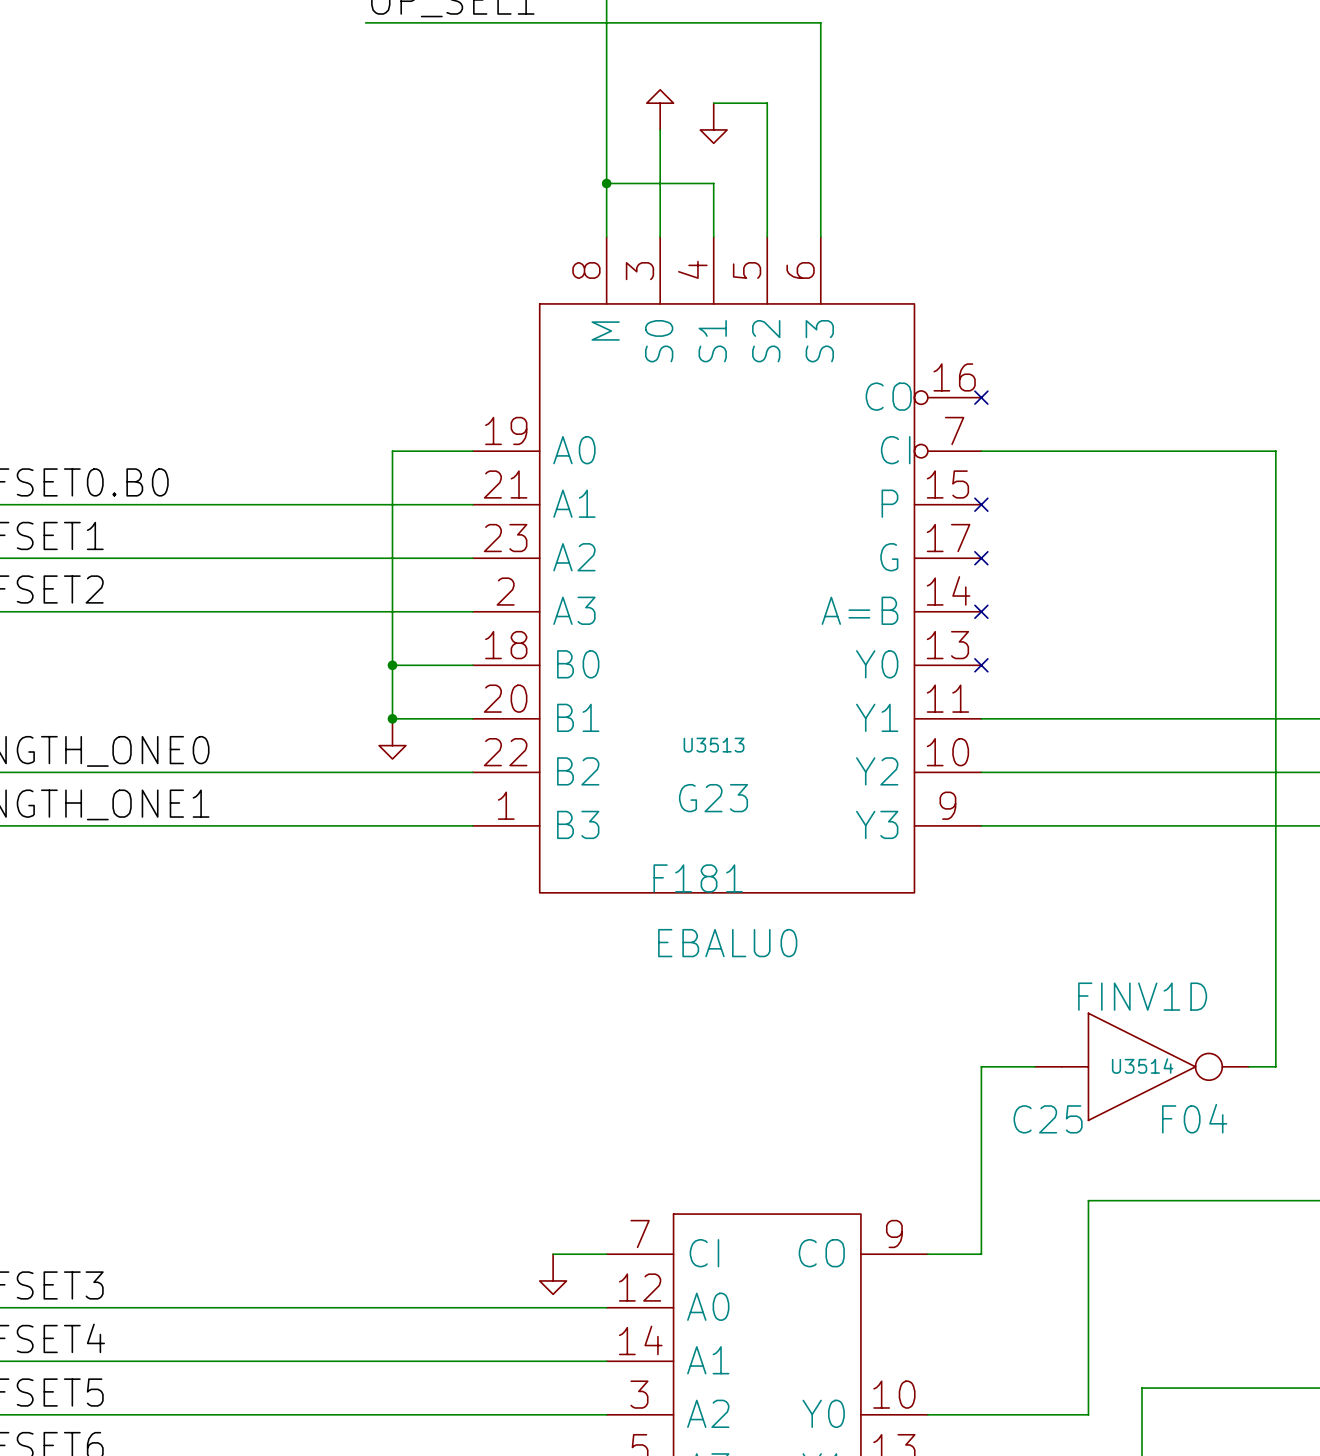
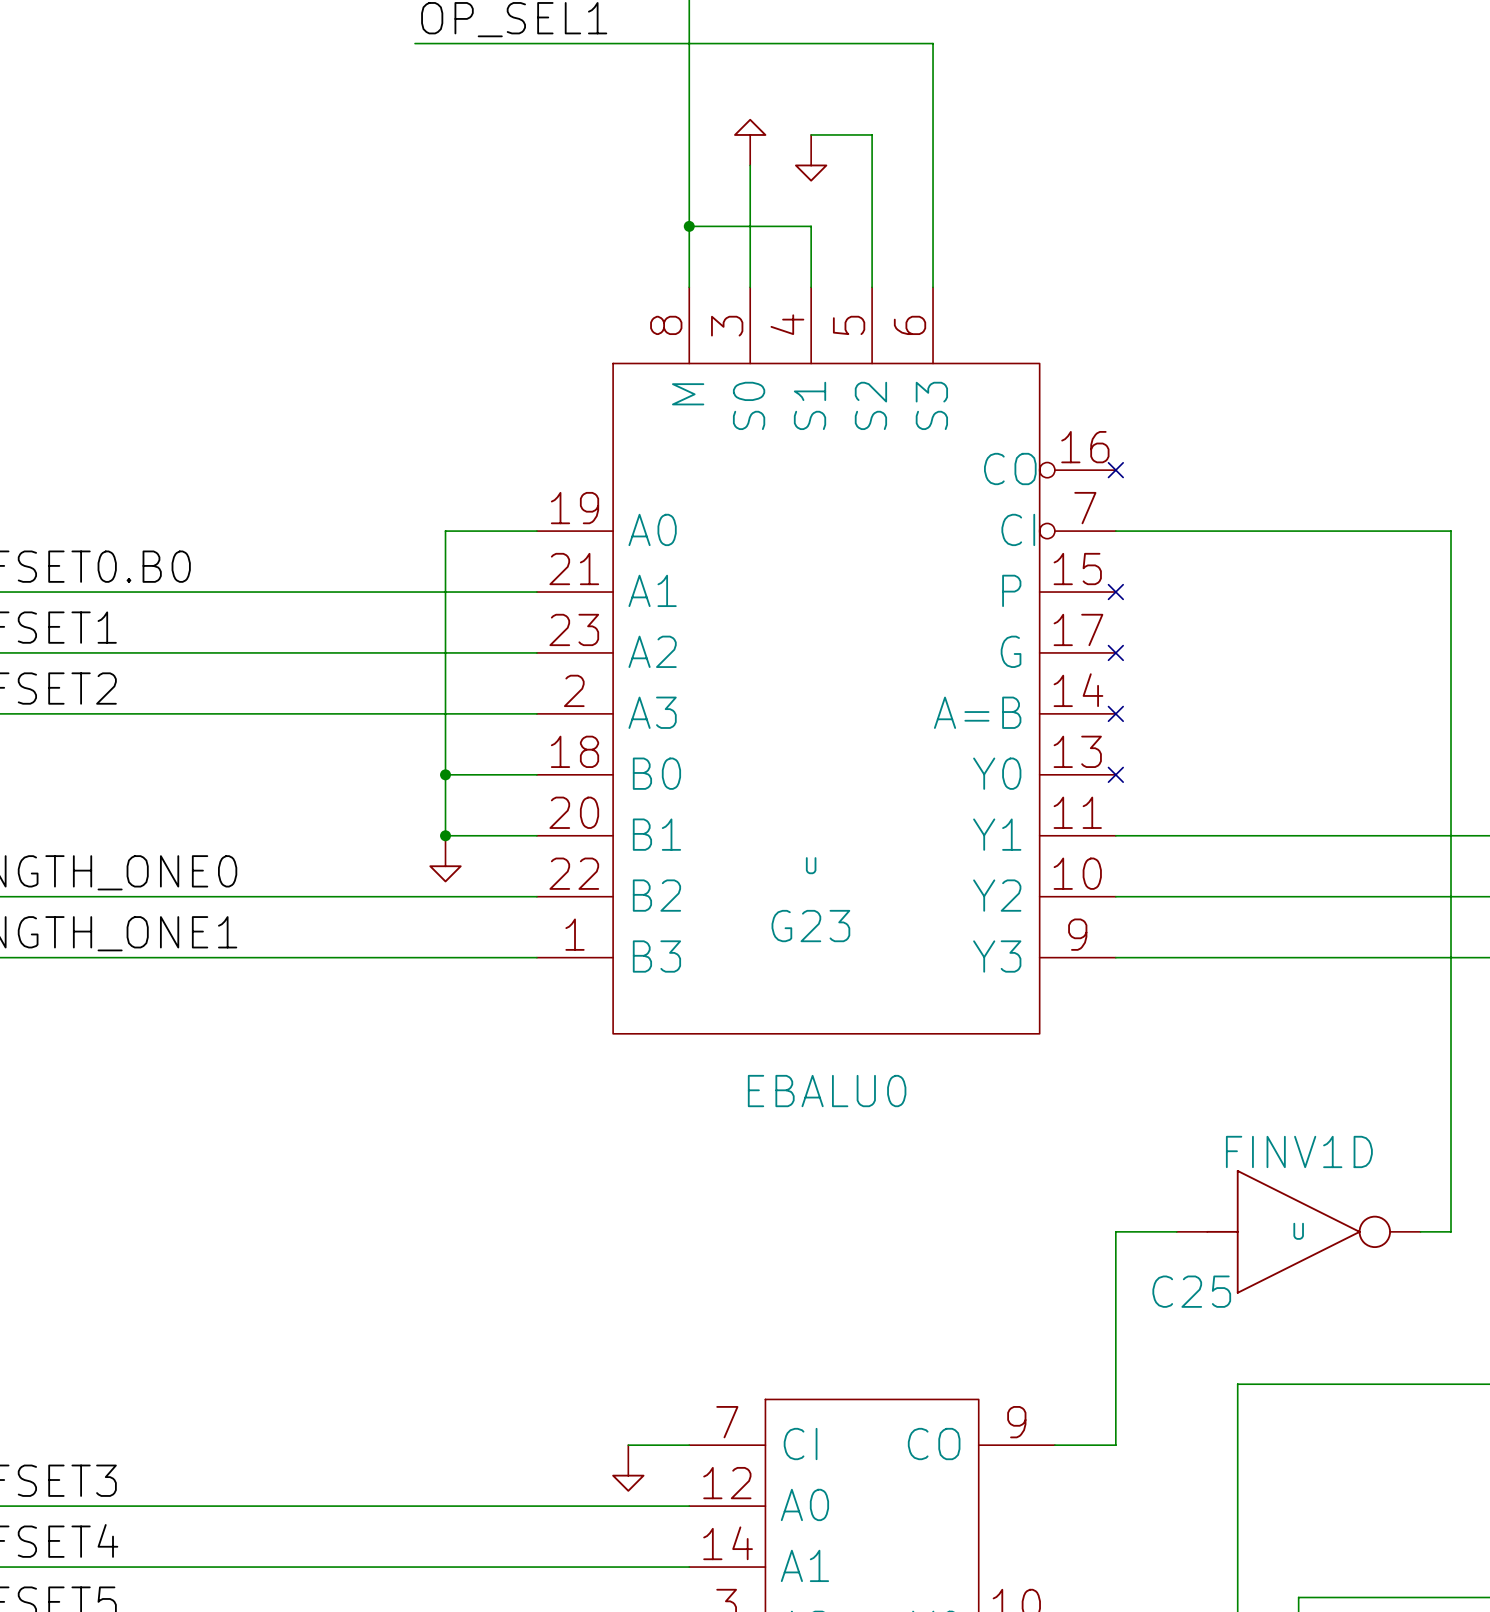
U3513 name: U3513 (714, 745) -> U (811, 865)
U3513 value: F181 (698, 878) -> none
U3514 name: U3514 (1142, 1066) -> U (1298, 1231)
U3514 value: F04 (1194, 1118) -> none

